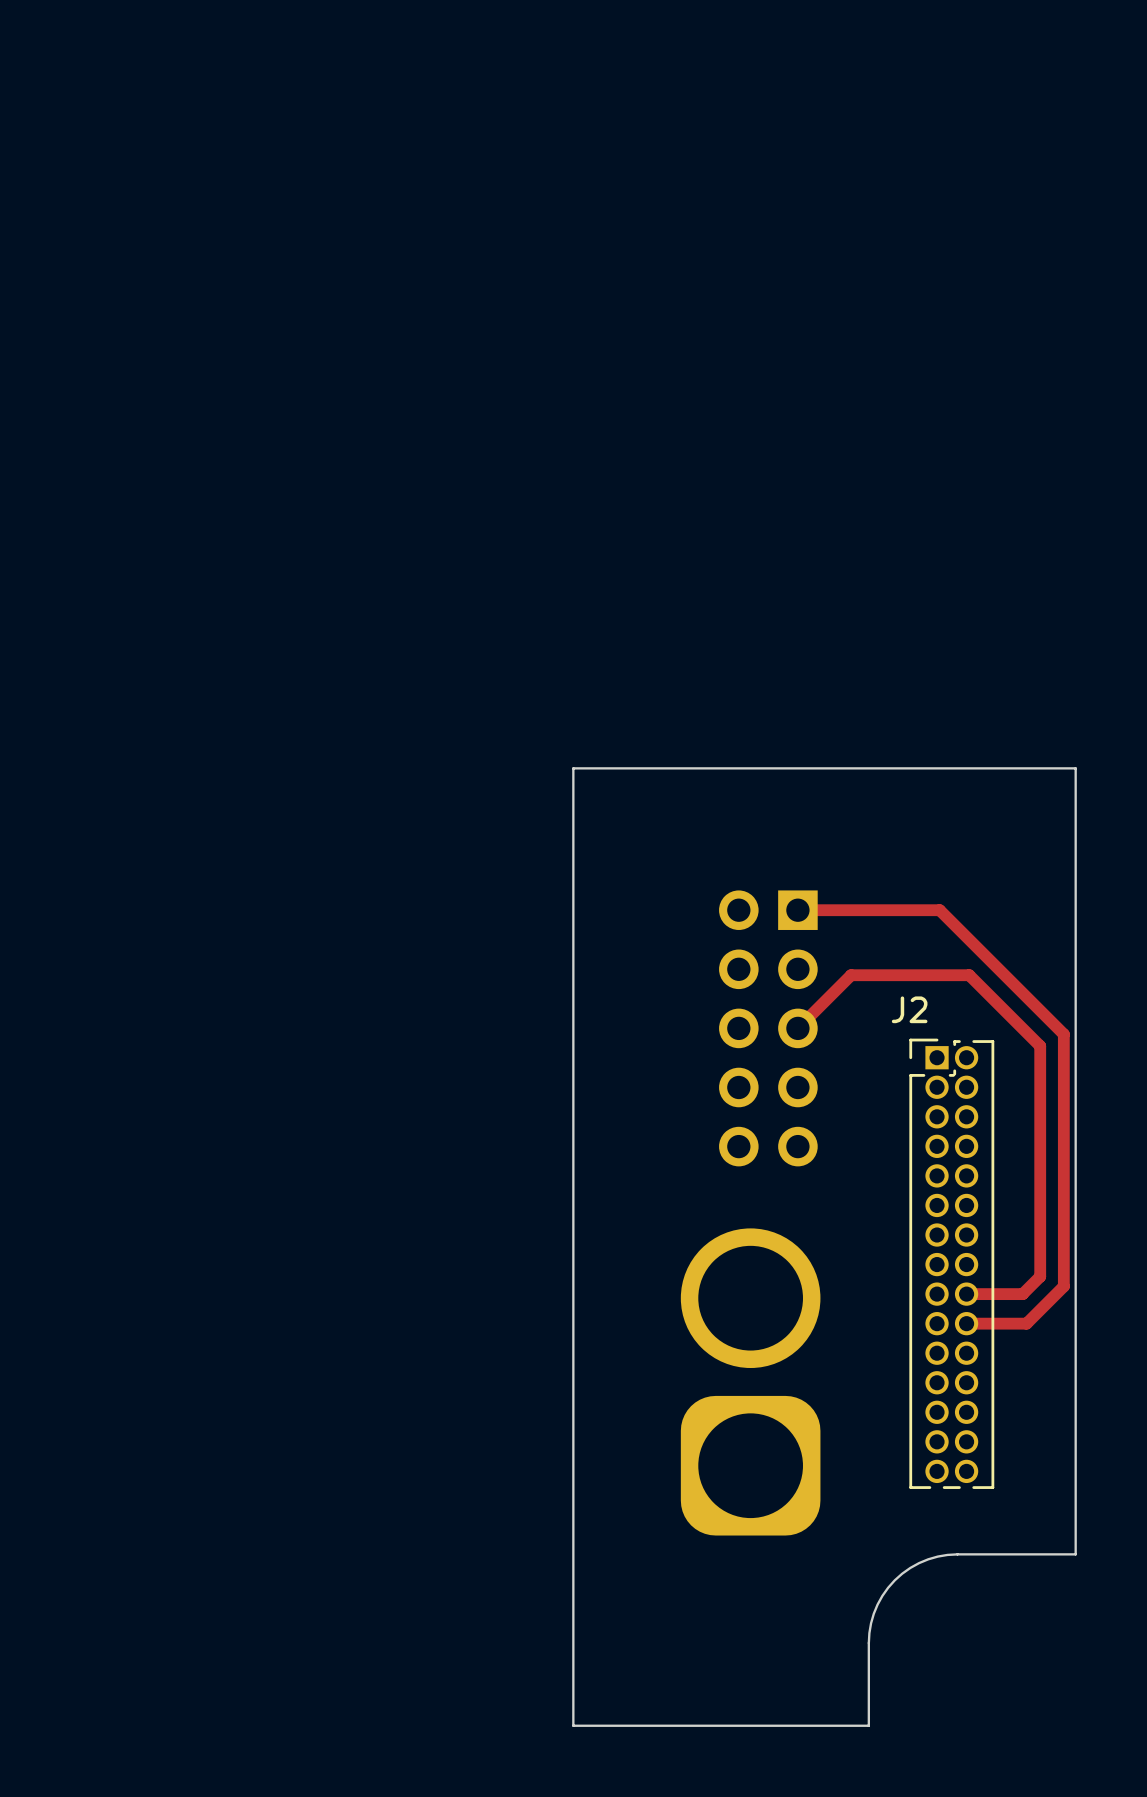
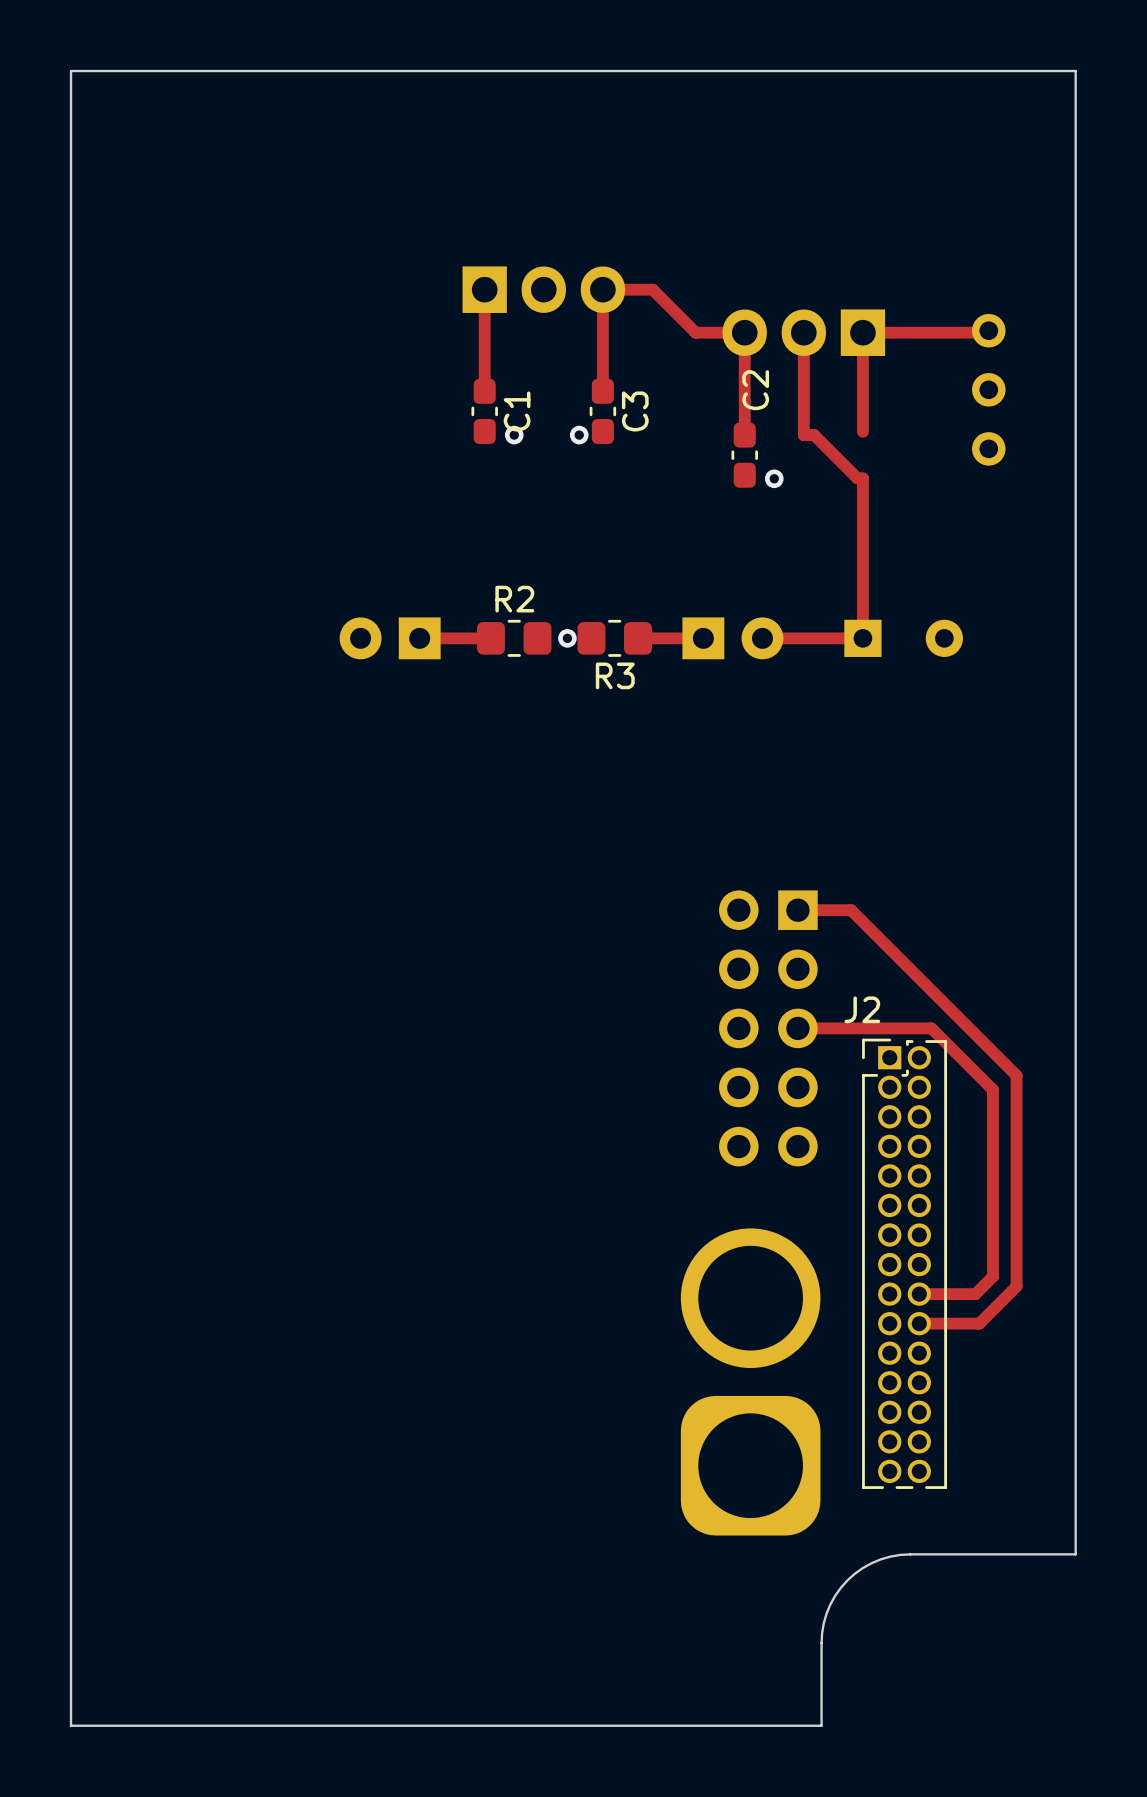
track: none -> (484, 289) (484, 391)
part: none -> (543, 289)
track: none -> (988, 330) (986, 332) (862, 332) (862, 431)
track: none -> (803, 332) (803, 435) (814, 435) (857, 478) (862, 478) (862, 638) (762, 638)
part: none -> (803, 332)
part: none -> (988, 389)
track: none -> (602, 391) (602, 289) (652, 289) (695, 332) (744, 332) (744, 435)
C1: none -> (484, 411)
C3: none -> (602, 411)
via: none -> (514, 435)
via: none -> (579, 435)
C2: none -> (744, 455)
via: none -> (774, 478)
part: none -> (390, 638)
track: none -> (419, 638) (490, 638)
R2: none -> (514, 638)
via: none -> (567, 638)
R3: none -> (614, 638)
track: none -> (637, 638) (703, 638)
part: none -> (732, 638)
part: none -> (903, 638)
board edge: (1075, 768) (573, 768) (573, 1725) -> (1075, 768) (1075, 71) (71, 71) (71, 1725) (573, 1725)
track: (851, 910) (939, 910) (1063, 1034) (1063, 1286) (1026, 1323) (979, 1323) -> (851, 910) (1016, 1075) (1016, 1286) (979, 1323)
track: (797, 1028) (851, 975) (969, 975) (1040, 1046) (1040, 1276) (1022, 1294) (975, 1294) -> (797, 1028) (931, 1028) (992, 1089) (992, 1276) (975, 1294)
J2 position: (951, 1263) -> (904, 1263)
track: none -> (919, 1294) (966, 1294)
track: none -> (919, 1323) (966, 1323)
board edge: (957, 1554) (937, 1556) (910, 1567) (894, 1580) (877, 1604) (869, 1633) (868, 1725) (821, 1725) -> (957, 1554) (910, 1554) (890, 1556) (863, 1567) (840, 1587) (830, 1604) (822, 1633) (821, 1725)

